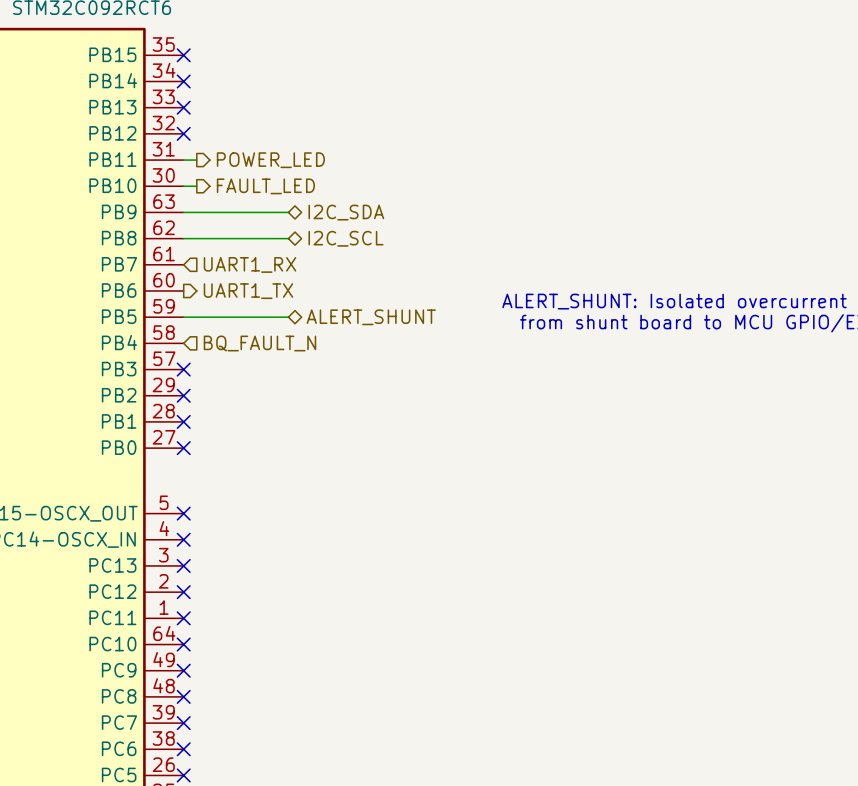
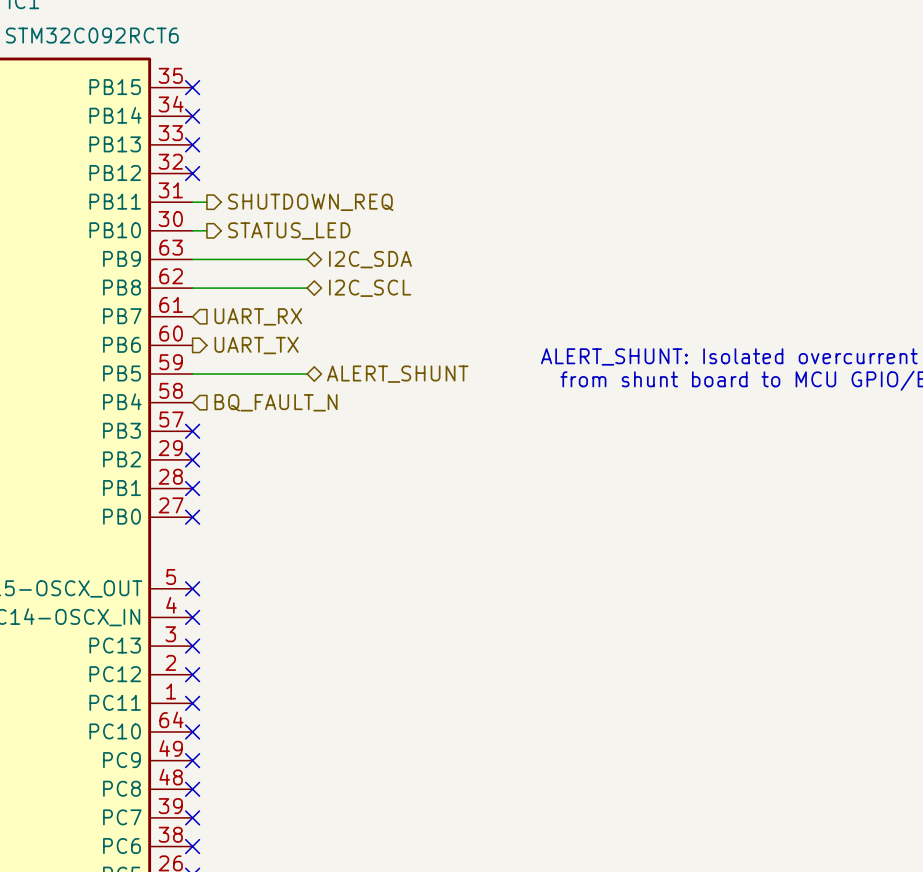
hierarchical label: POWER_LED (270, 160) -> SHUTDOWN_REQ (310, 202)
hierarchical label: FAULT_LED (265, 186) -> STATUS_LED (289, 230)
hierarchical label: UART1_RX (250, 264) -> UART_RX (258, 316)
hierarchical label: UART1_TX (248, 291) -> UART_TX (256, 345)

